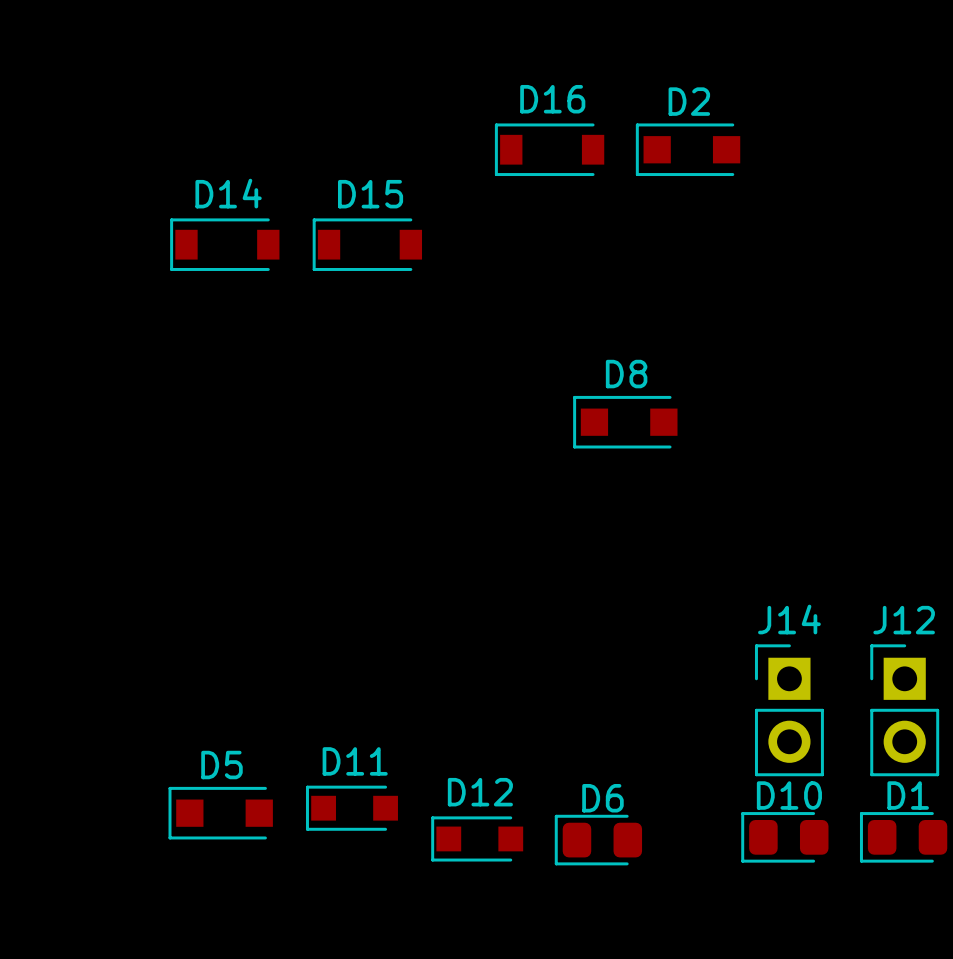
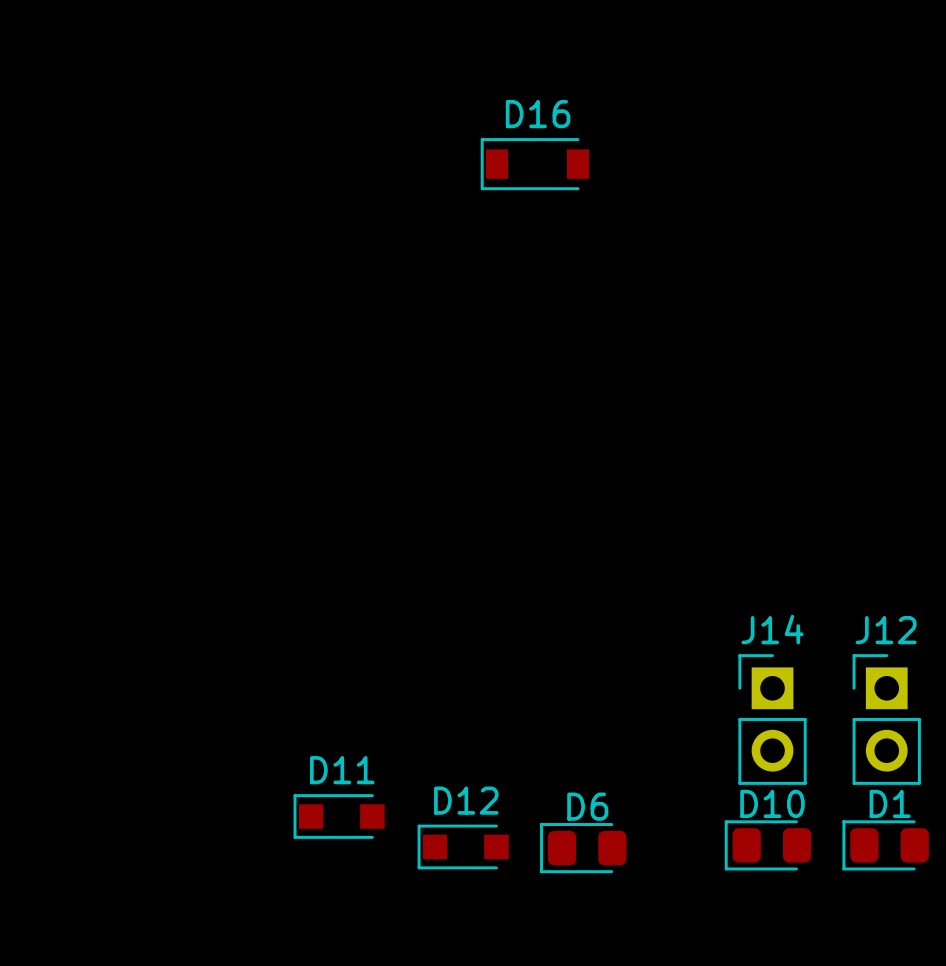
D2: (688, 149) -> none
D14: (224, 244) -> none
D15: (367, 244) -> none
D8: (625, 422) -> none
D5: (220, 813) -> none

